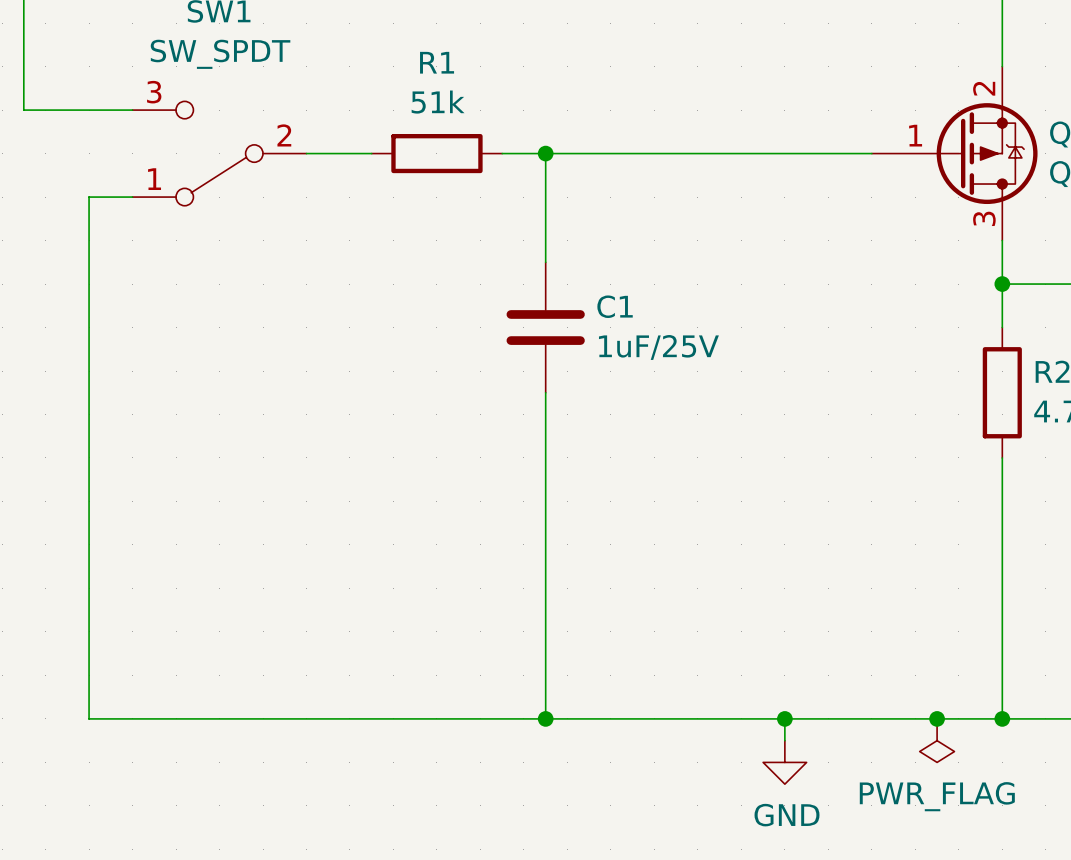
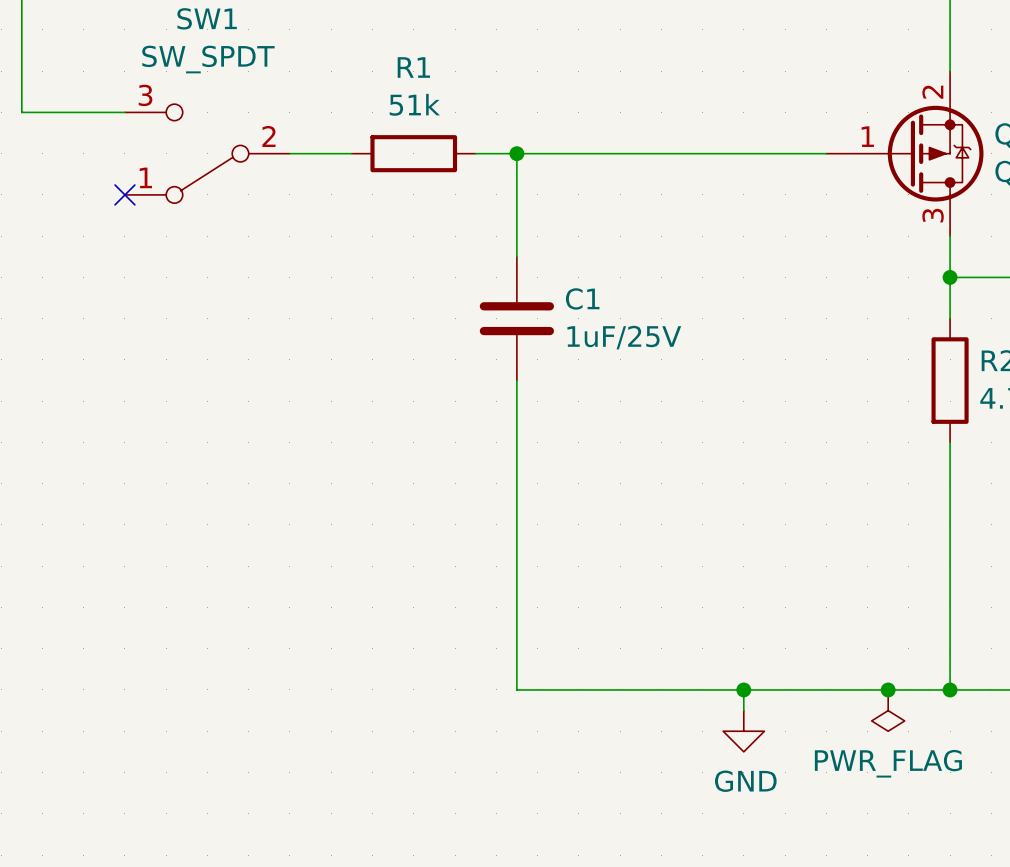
wire: (132, 197) (89, 197) (89, 718) (545, 718) -> none
no-connect mark: none -> (124, 194)
junction: (545, 718) -> none

